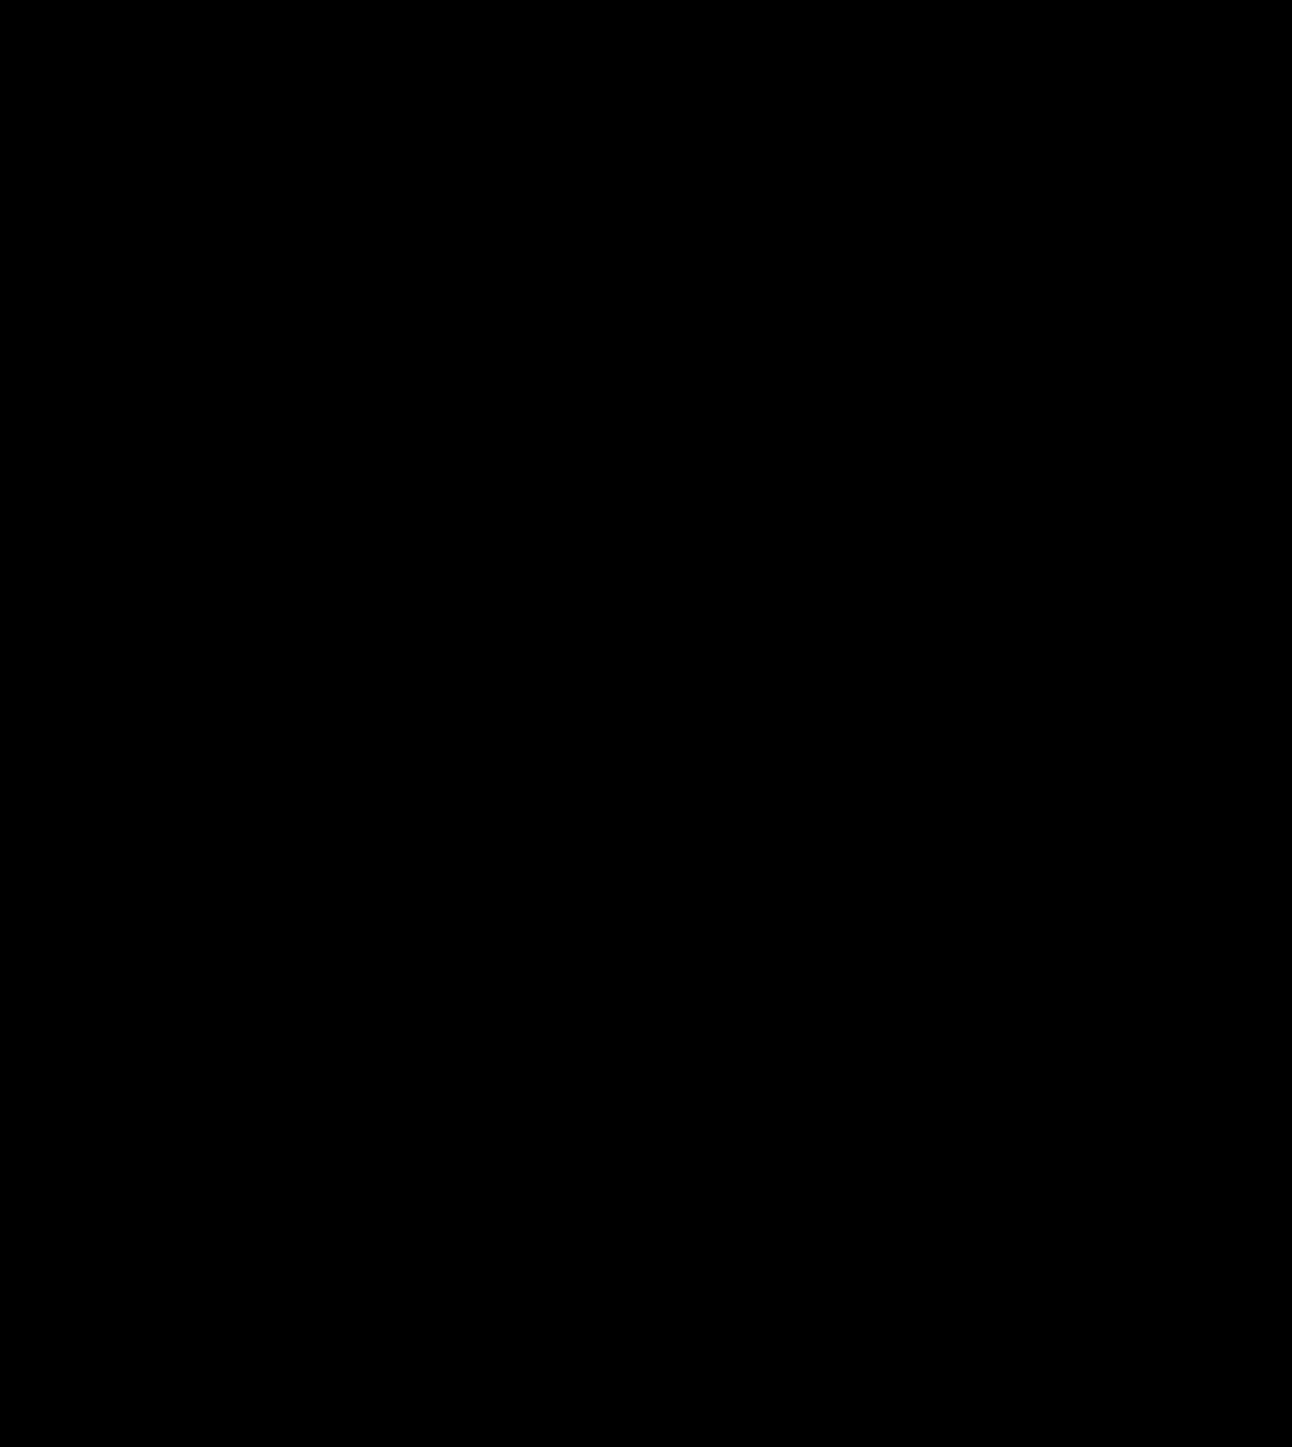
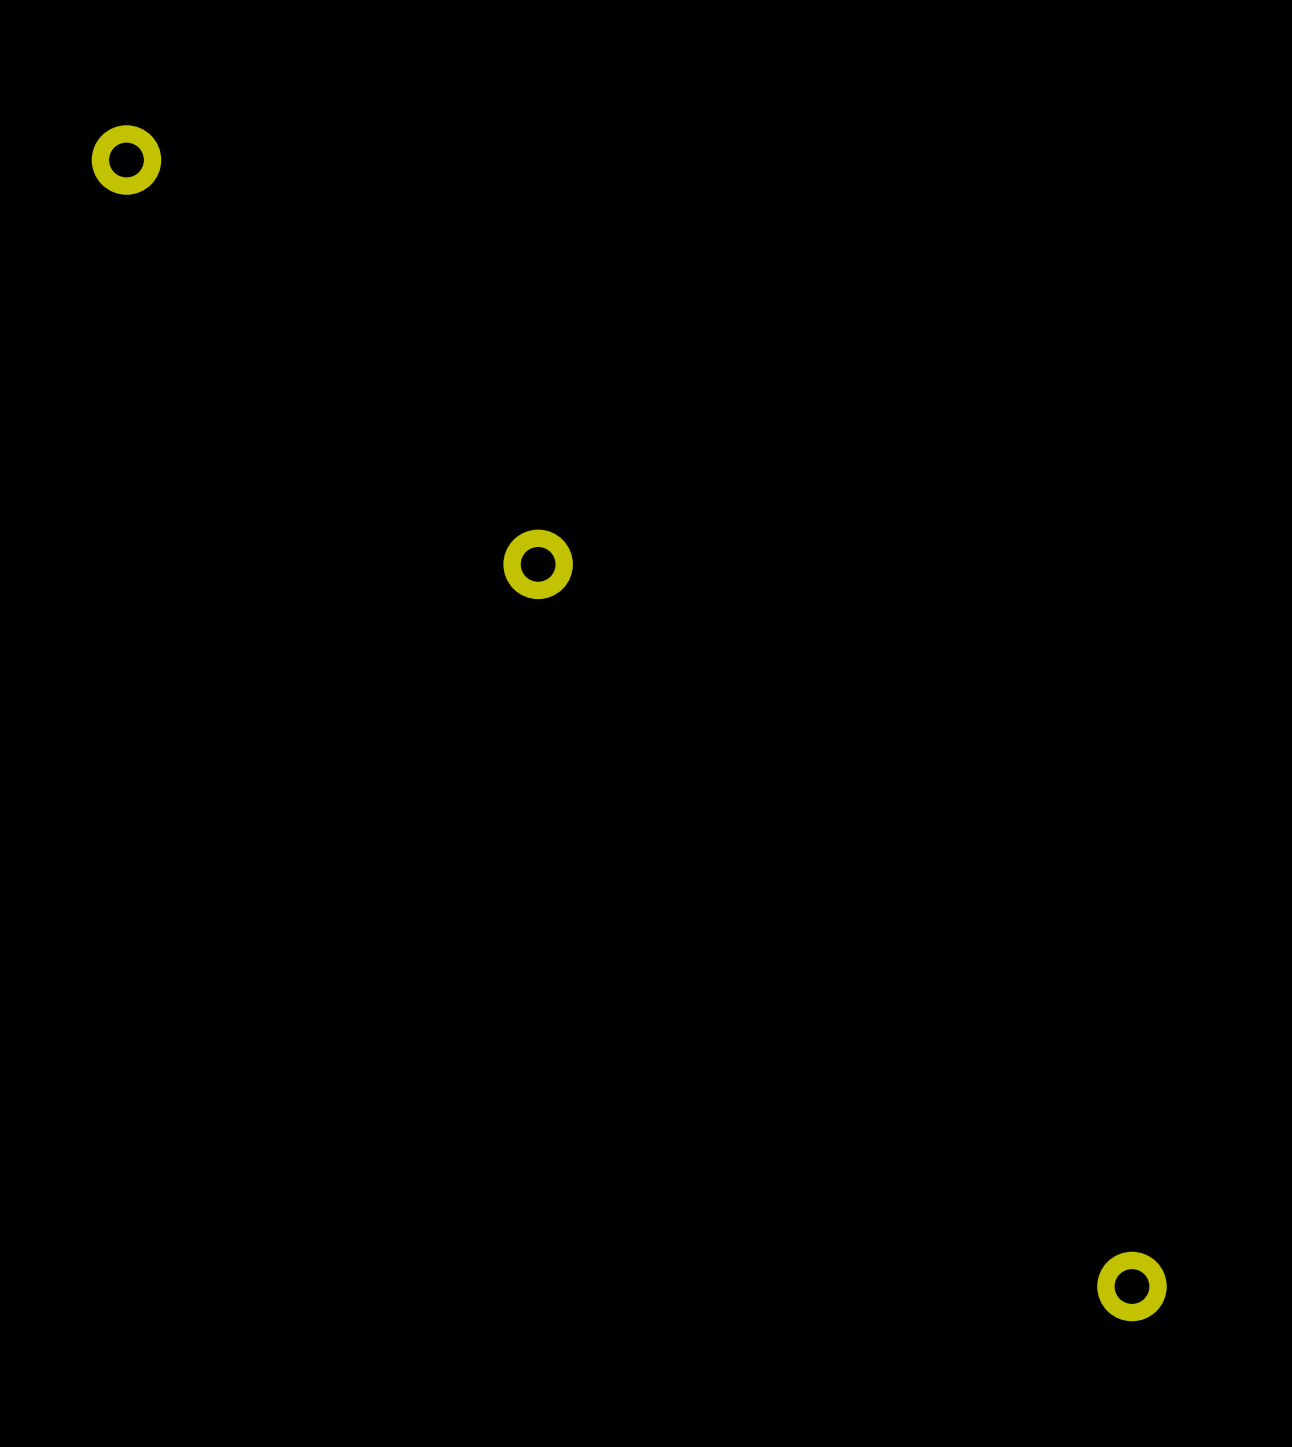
part: none -> (126, 160)
part: none -> (538, 564)
part: none -> (1131, 1286)

